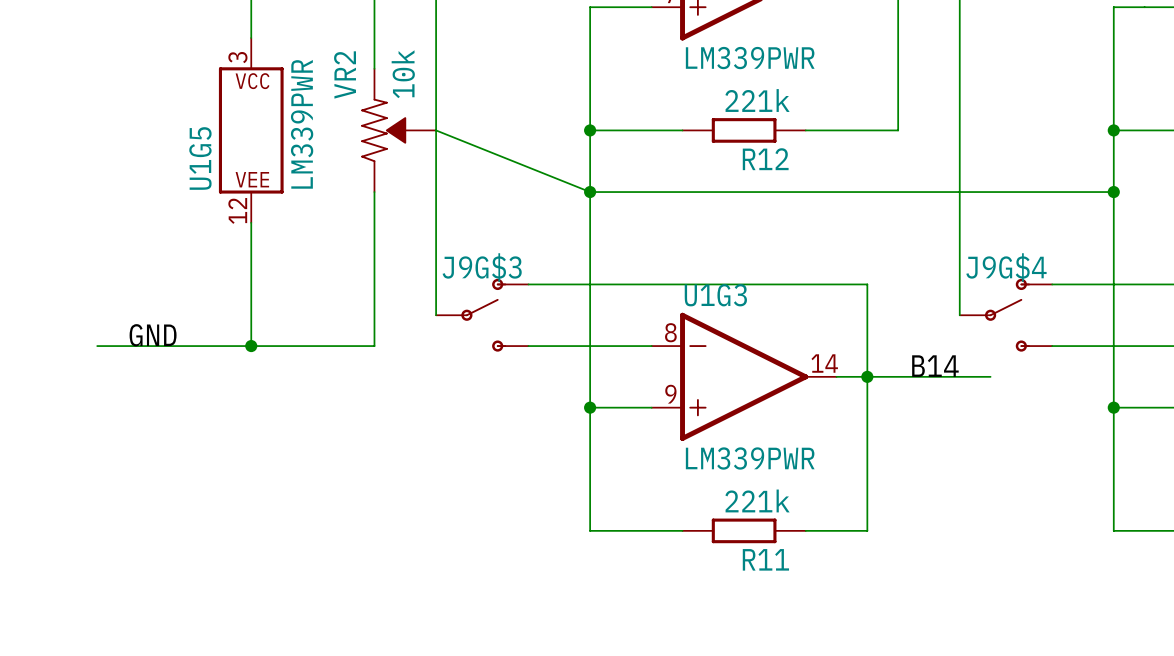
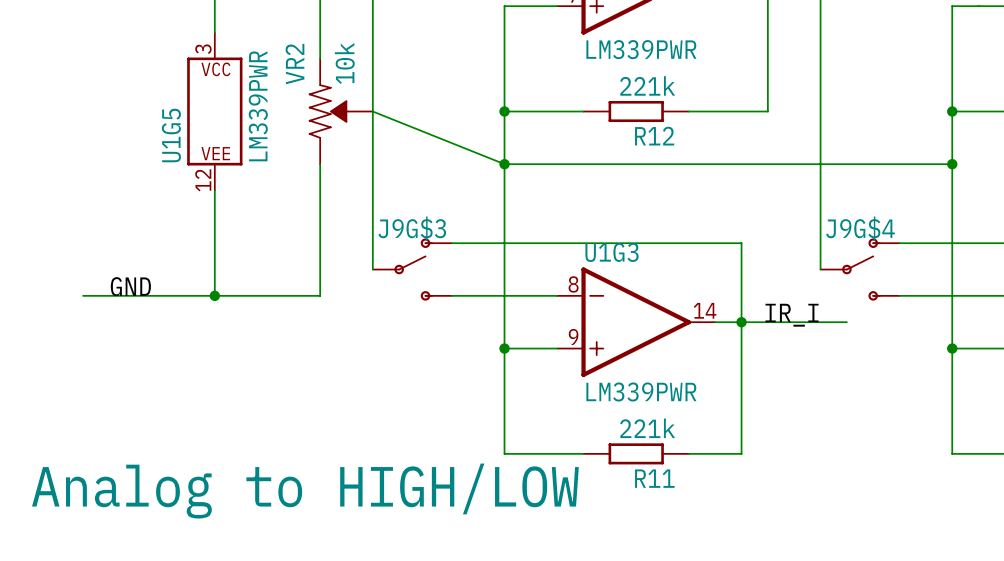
label: B14 (935, 366) -> IR_I (792, 315)
text: none -> Analog to HIGH/LOW (305, 491)

